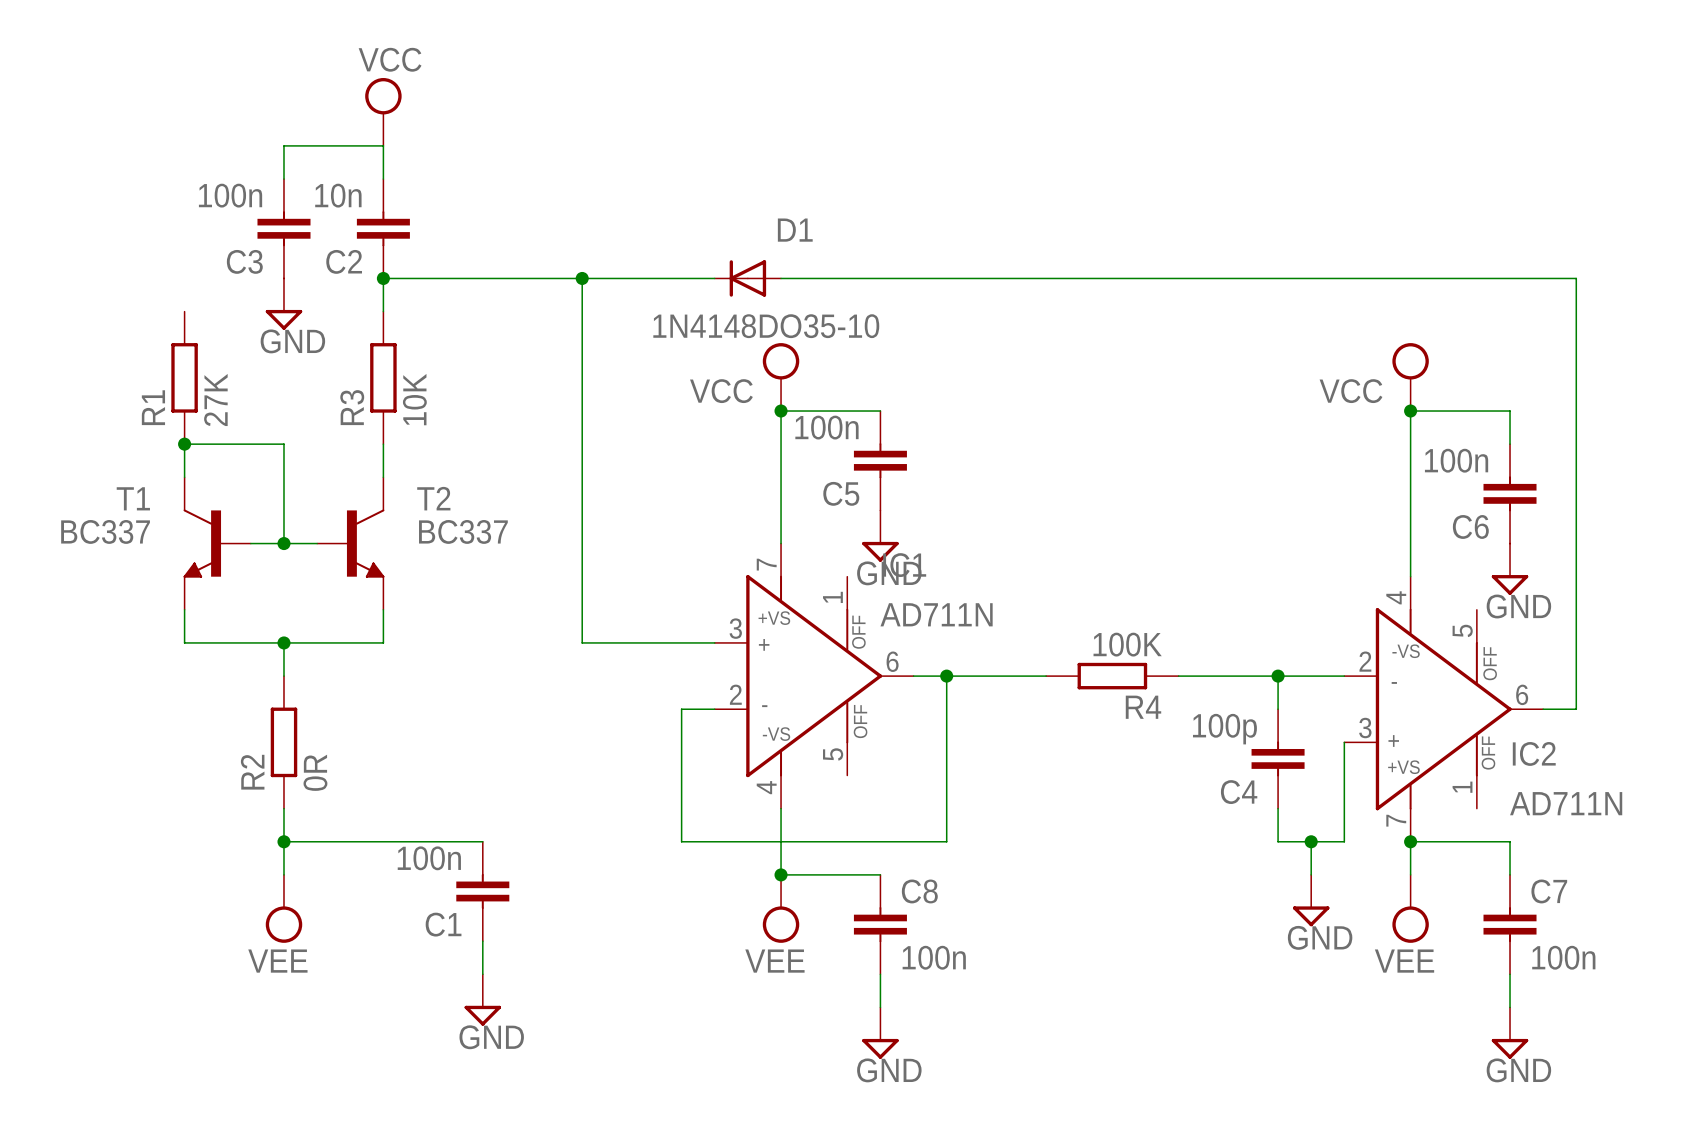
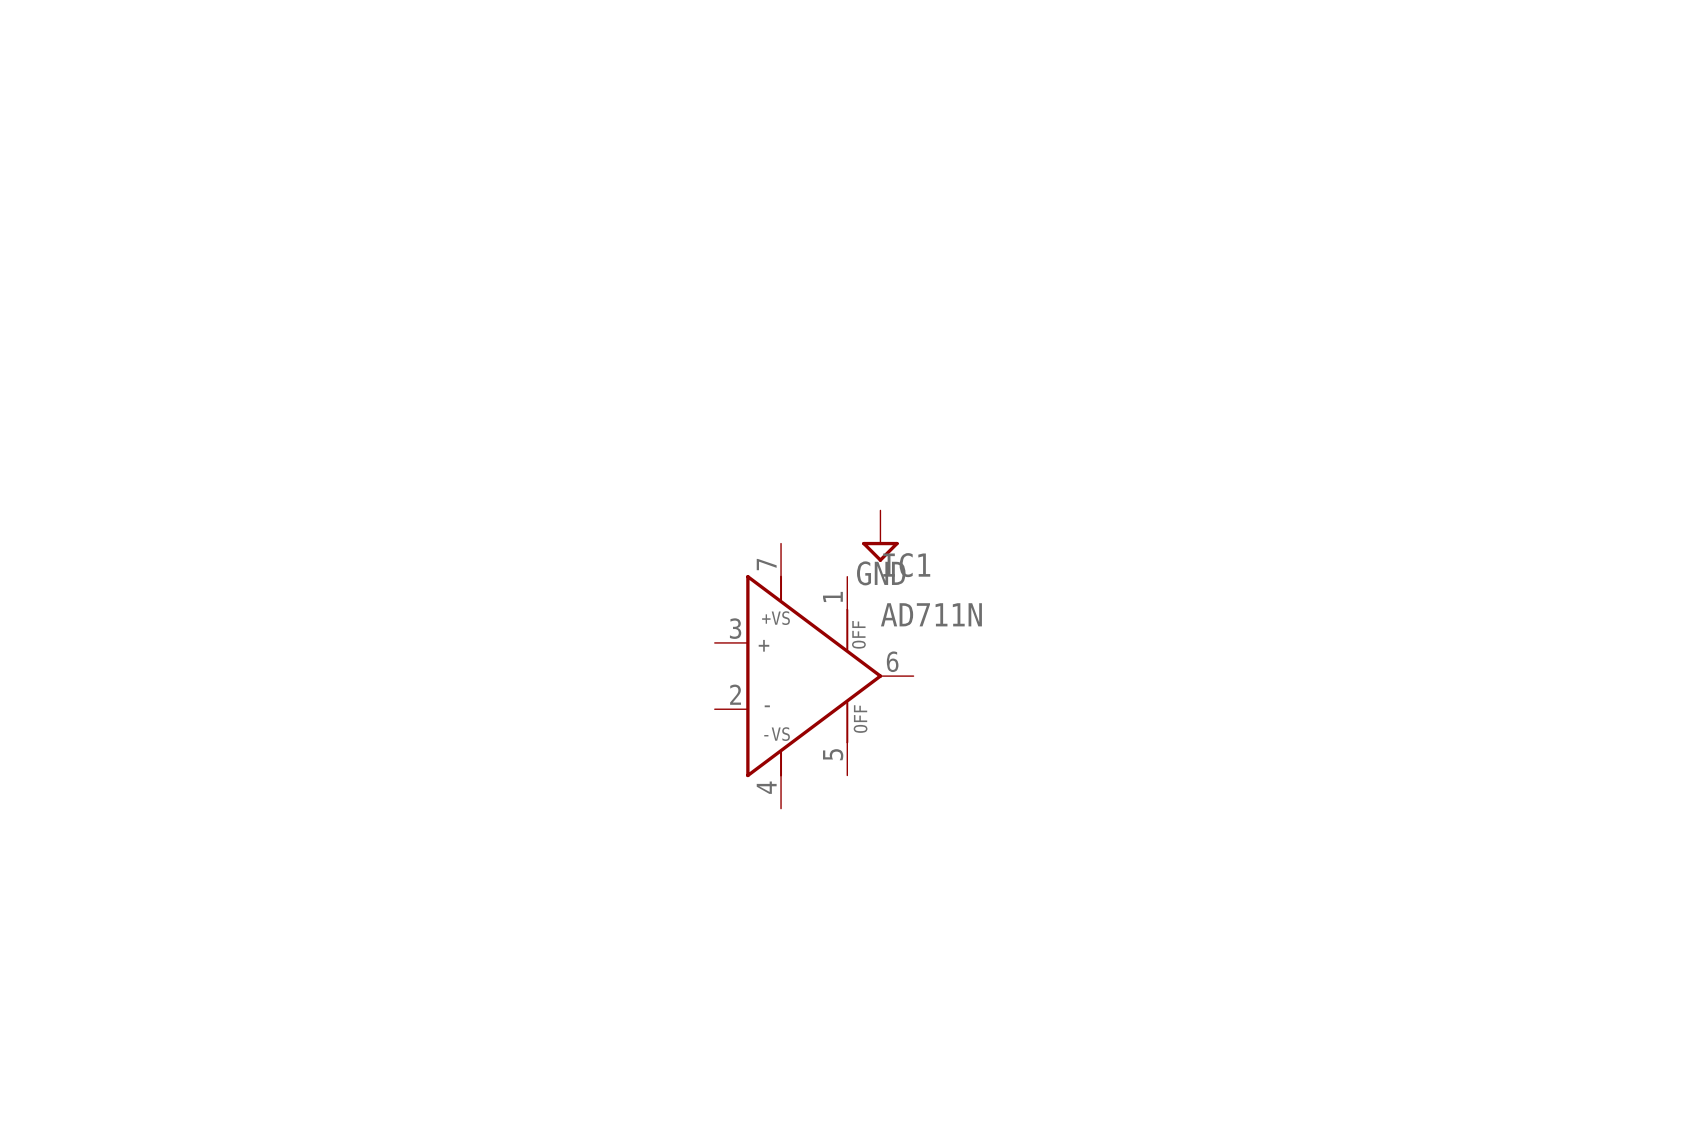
power symbol: VCC (383, 111) -> none
wire: (283, 179) (283, 145) (383, 145) (383, 179) -> none
C3: 100n (283, 228) -> none
C2: 10n (383, 228) -> none
junction: (383, 278) -> none
wire: (582, 278) (582, 642) (714, 642) -> none
junction: (582, 278) -> none
wire: (714, 278) (383, 278) (383, 311) -> none
D1: 1N4148DO35-10 (747, 278) -> none
wire: (781, 278) (1576, 278) (1576, 709) (1543, 709) -> none
power symbol: GND (283, 304) -> none
R1: 27K (184, 377) -> none
R3: 10K (383, 377) -> none
power symbol: VCC (781, 377) -> none
power symbol: VCC (1410, 377) -> none
junction: (781, 411) -> none
wire: (880, 411) (781, 411) (781, 543) -> none
junction: (1410, 411) -> none
junction: (184, 444) -> none
wire: (383, 444) (383, 477) -> none
wire: (1510, 444) (1510, 411) (1410, 411) (1410, 576) -> none
C5: 100n (880, 460) -> none
wire: (184, 477) (184, 444) (283, 444) (283, 543) -> none
C6: 100n (1510, 493) -> none
T1: BC337 (217, 543) -> none
wire: (250, 543) (317, 543) -> none
junction: (283, 543) -> none
T2: BC337 (350, 543) -> none
power symbol: GND (1510, 569) -> none
wire: (184, 609) (184, 642) (383, 642) (383, 609) -> none
wire: (283, 642) (283, 676) -> none
junction: (283, 642) -> none
wire: (913, 676) (1046, 676) -> none
wire: (946, 676) (946, 841) (681, 841) (681, 709) (714, 709) -> none
junction: (946, 676) -> none
R4: 100K (1112, 676) -> none
wire: (1178, 676) (1344, 676) -> none
wire: (1278, 676) (1278, 709) -> none
junction: (1278, 676) -> none
IC2: AD711N (1443, 709) -> none
R2: 0R (283, 742) -> none
wire: (1344, 742) (1344, 841) (1278, 841) (1278, 808) -> none
C4: 100p (1278, 758) -> none
wire: (283, 808) (283, 874) -> none
wire: (781, 808) (781, 874) (880, 874) -> none
wire: (283, 841) (482, 841) -> none
junction: (283, 841) -> none
wire: (1311, 841) (1311, 874) -> none
junction: (1311, 841) -> none
junction: (1410, 841) -> none
junction: (781, 874) -> none
wire: (1410, 874) (1410, 841) (1510, 841) (1510, 874) -> none
C1: 100n (482, 891) -> none
power symbol: GND (1311, 900) -> none
power symbol: VEE (283, 908) -> none
power symbol: VEE (781, 908) -> none
power symbol: VEE (1410, 908) -> none
C8: 100n (880, 924) -> none
C7: 100n (1510, 924) -> none
wire: (482, 941) (482, 974) -> none
wire: (880, 974) (880, 1007) -> none
wire: (1510, 974) (1510, 1007) -> none
power symbol: GND (482, 999) -> none
power symbol: GND (880, 1033) -> none
power symbol: GND (1510, 1033) -> none

